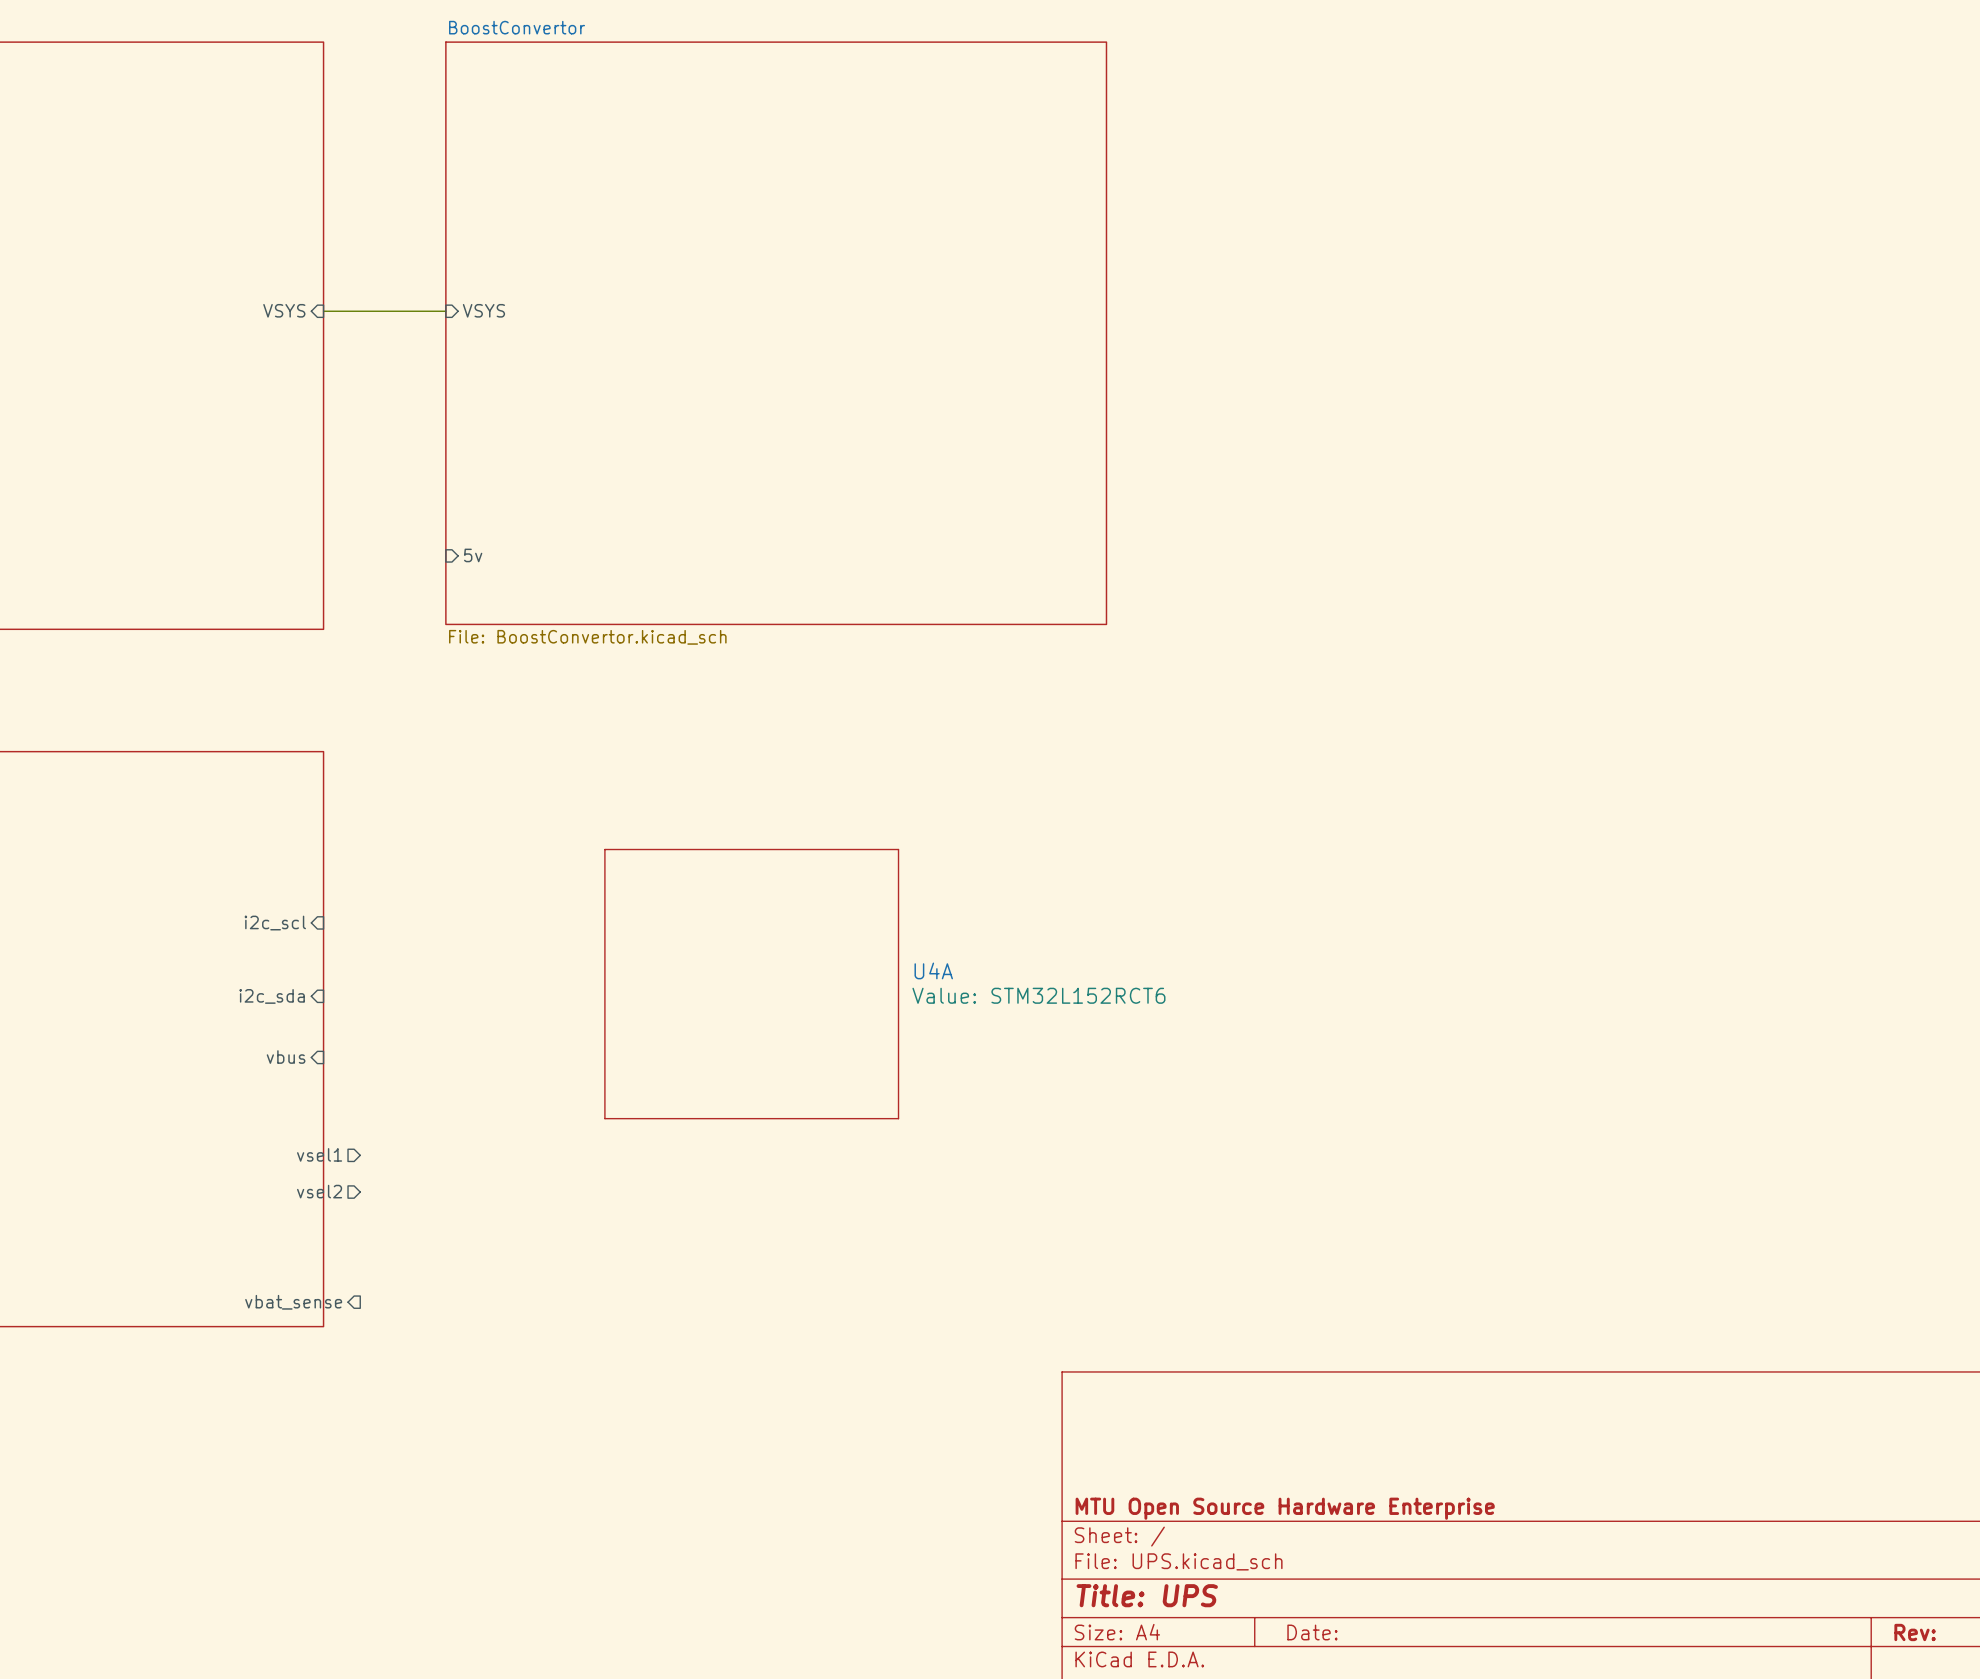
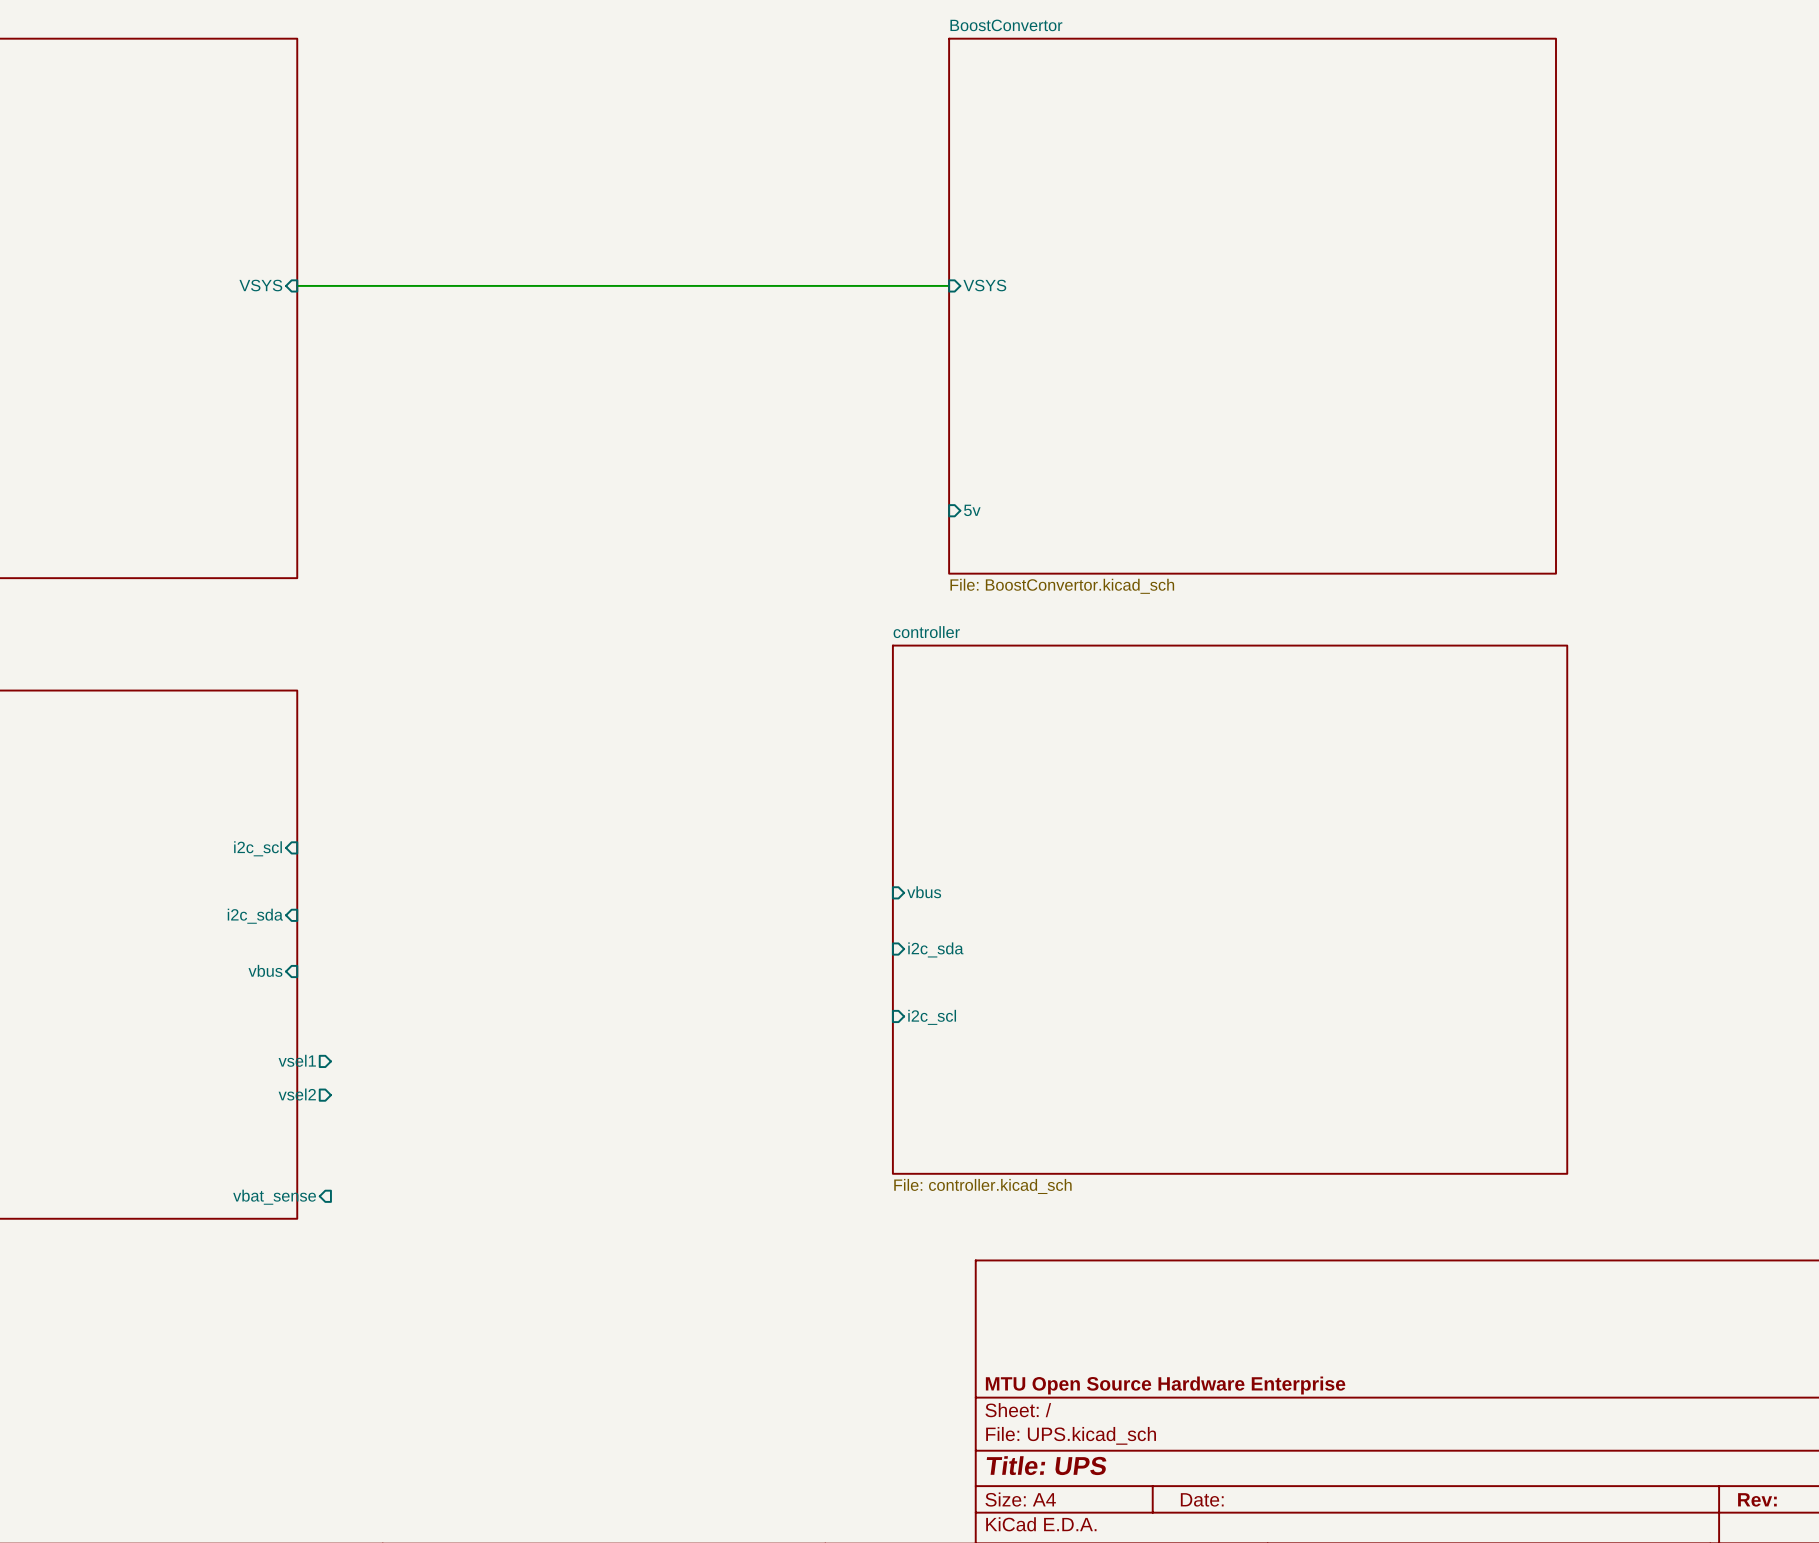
sheet pin: VSYS (483, 310) -> none
sheet pin: none -> VSYS (984, 285)
wire: none -> (409, 285) (949, 285)
sheet BoostConvertor: File: BoostConvertor.kicad_sch (776, 333) -> none
sheet BoostConvertor: none -> File: BoostConvertor.kicad_sch (1252, 306)
sheet pin: 5v (473, 555) -> none
sheet pin: none -> 5v (972, 510)
sheet pin: none -> vbus (924, 892)
U4A: Value: STM32L152RCT6 (751, 984) -> none
sheet controller: none -> File: controller.kicad_sch (1230, 909)
sheet pin: none -> i2c_sda (935, 949)
sheet pin: none -> i2c_scl (932, 1017)

